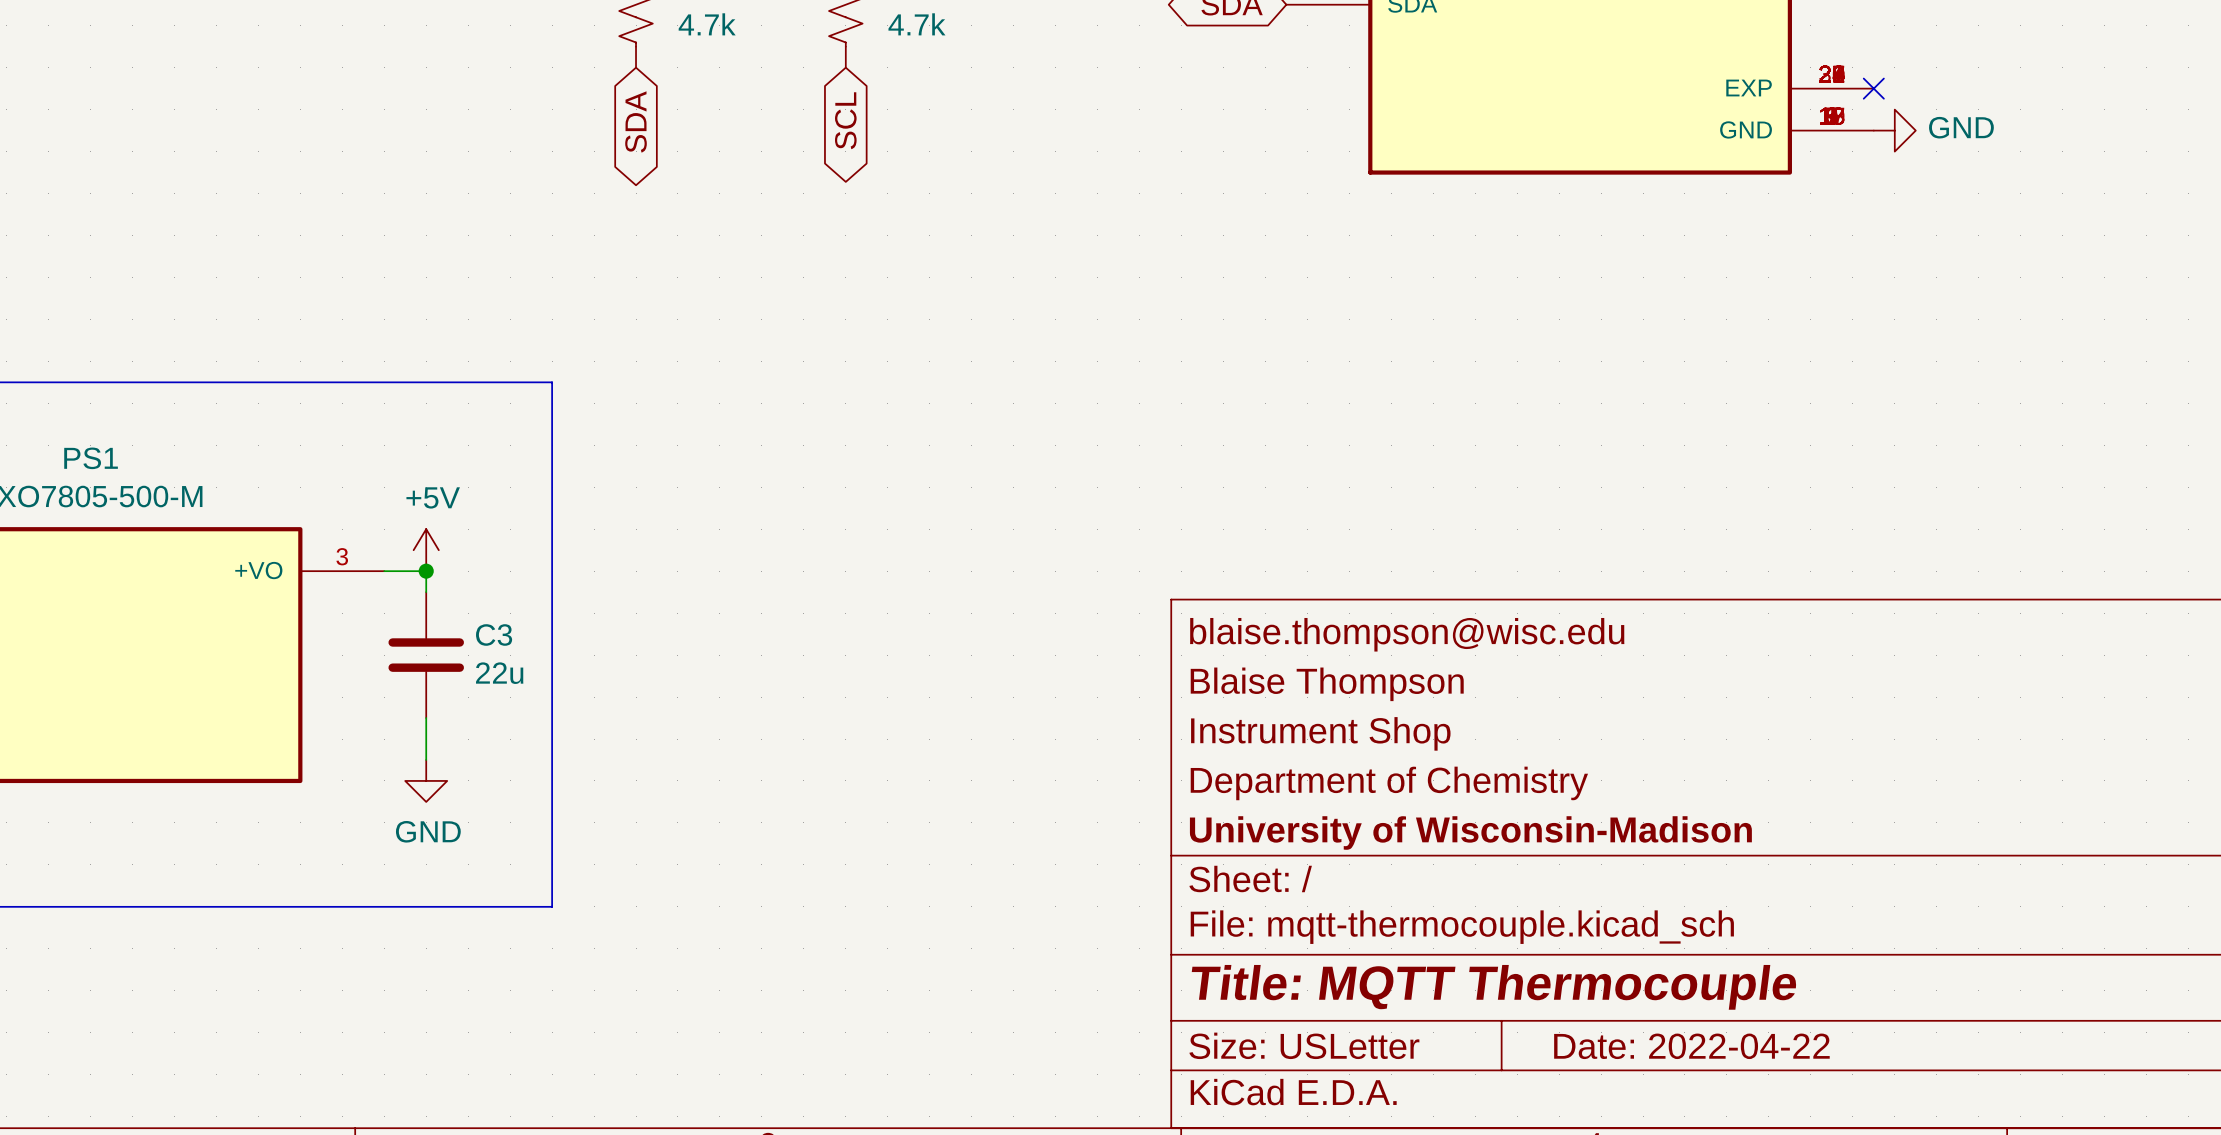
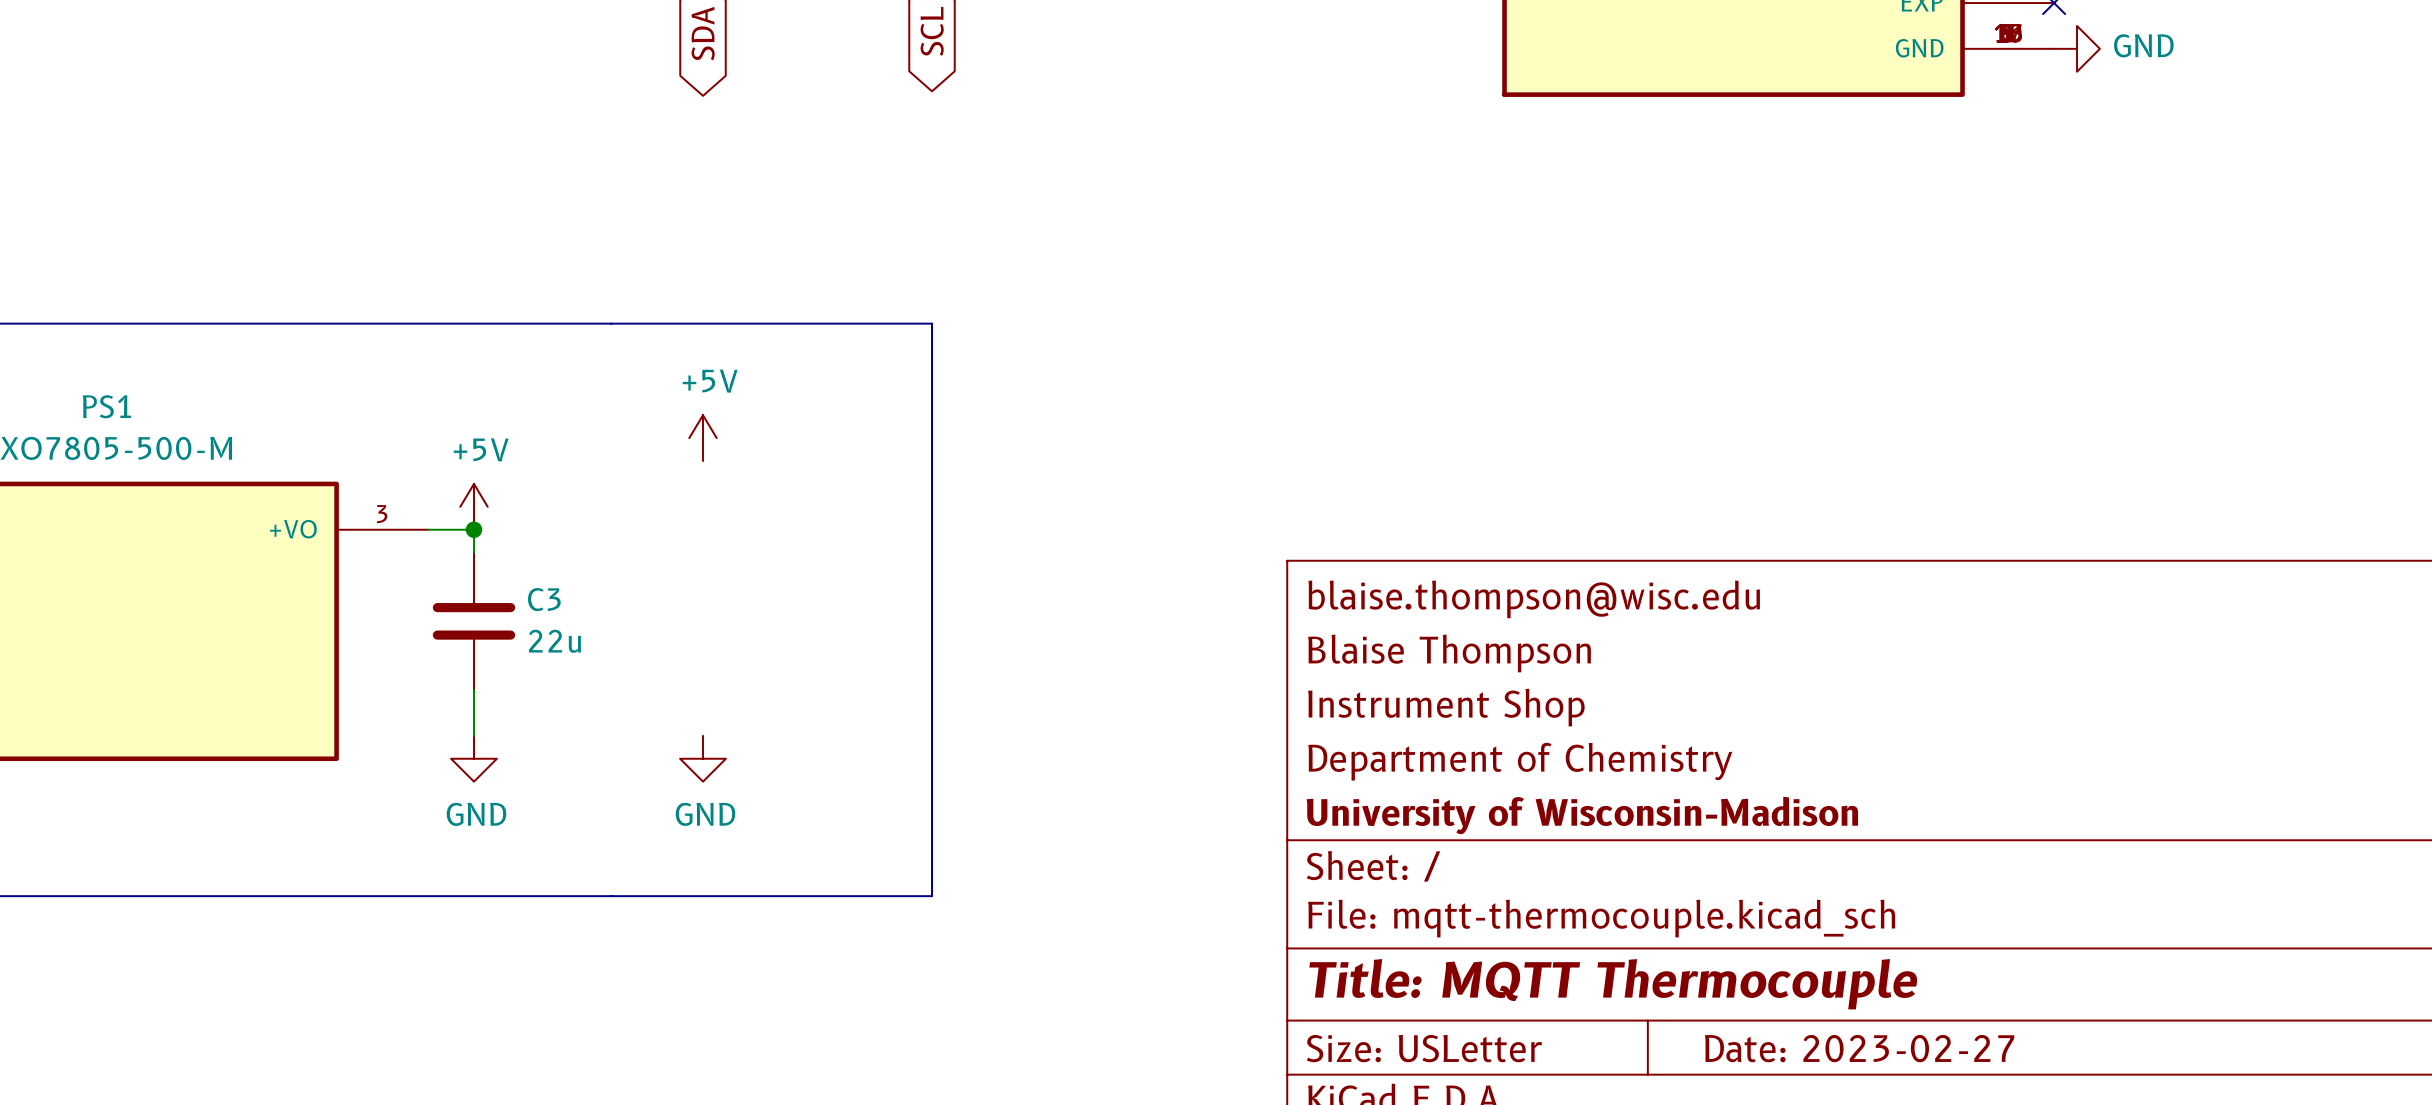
line: (552, 382) (552, 906) -> (611, 323) (931, 323) (931, 896) (611, 896)
power symbol: none -> +5V (702, 438)
power symbol: none -> GND (702, 758)
title block: Date: 2022-04-22 (1691, 1046) -> Date: 2023-02-27 (1859, 1048)

